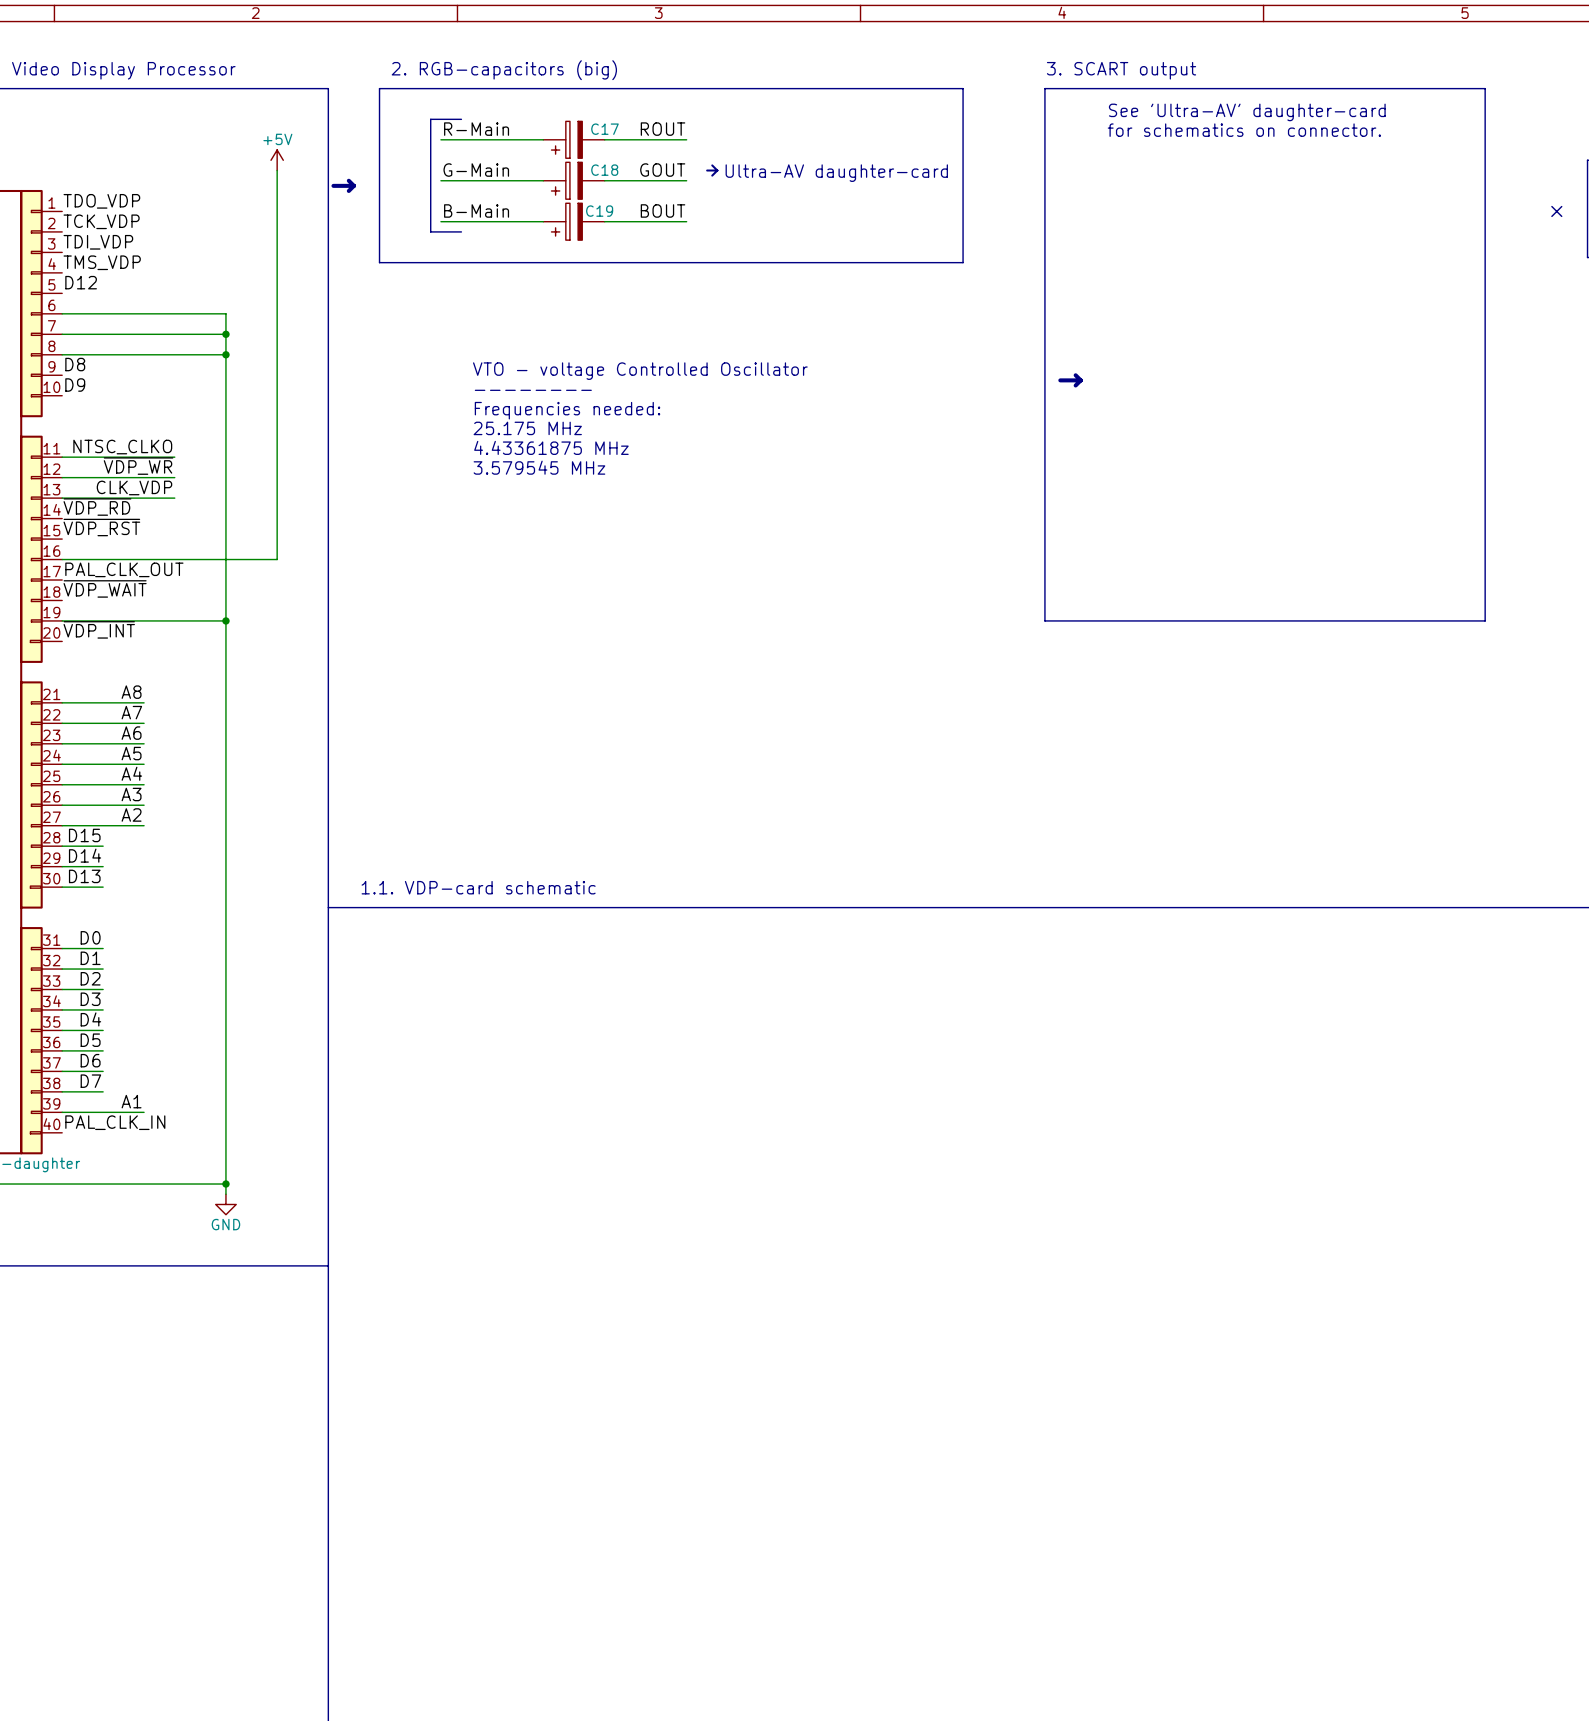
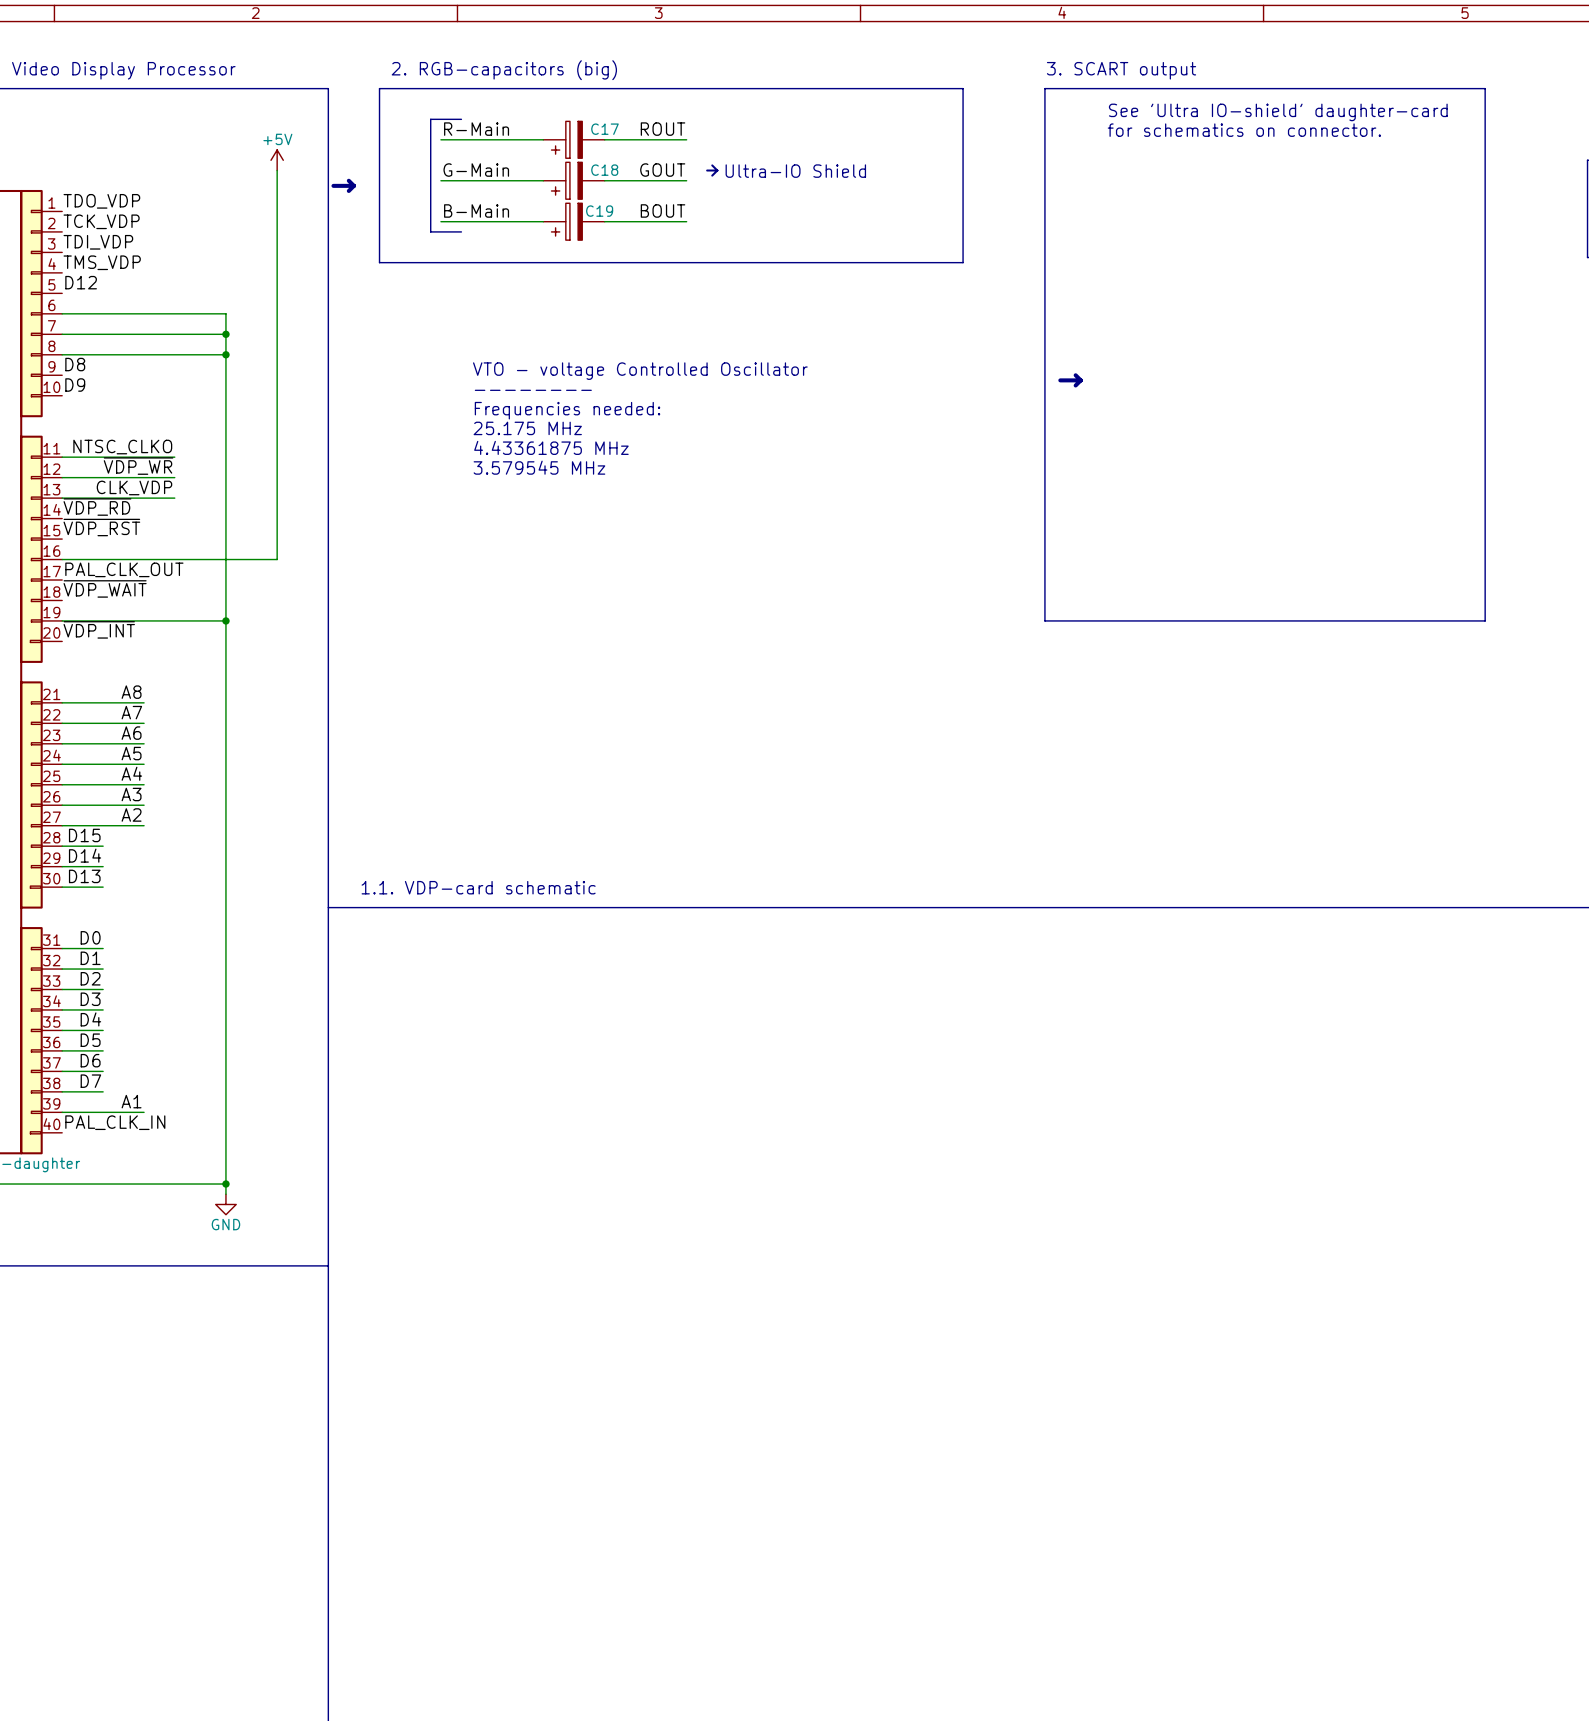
text: See 'Ultra-AV' daughter-card (1247, 112) -> See 'Ultra IO-shield' daughter-card (1278, 112)
text: Ultra-AV daughter-card (836, 173) -> Ultra-IO Shield (795, 171)
no-connect mark: (1556, 211) -> none

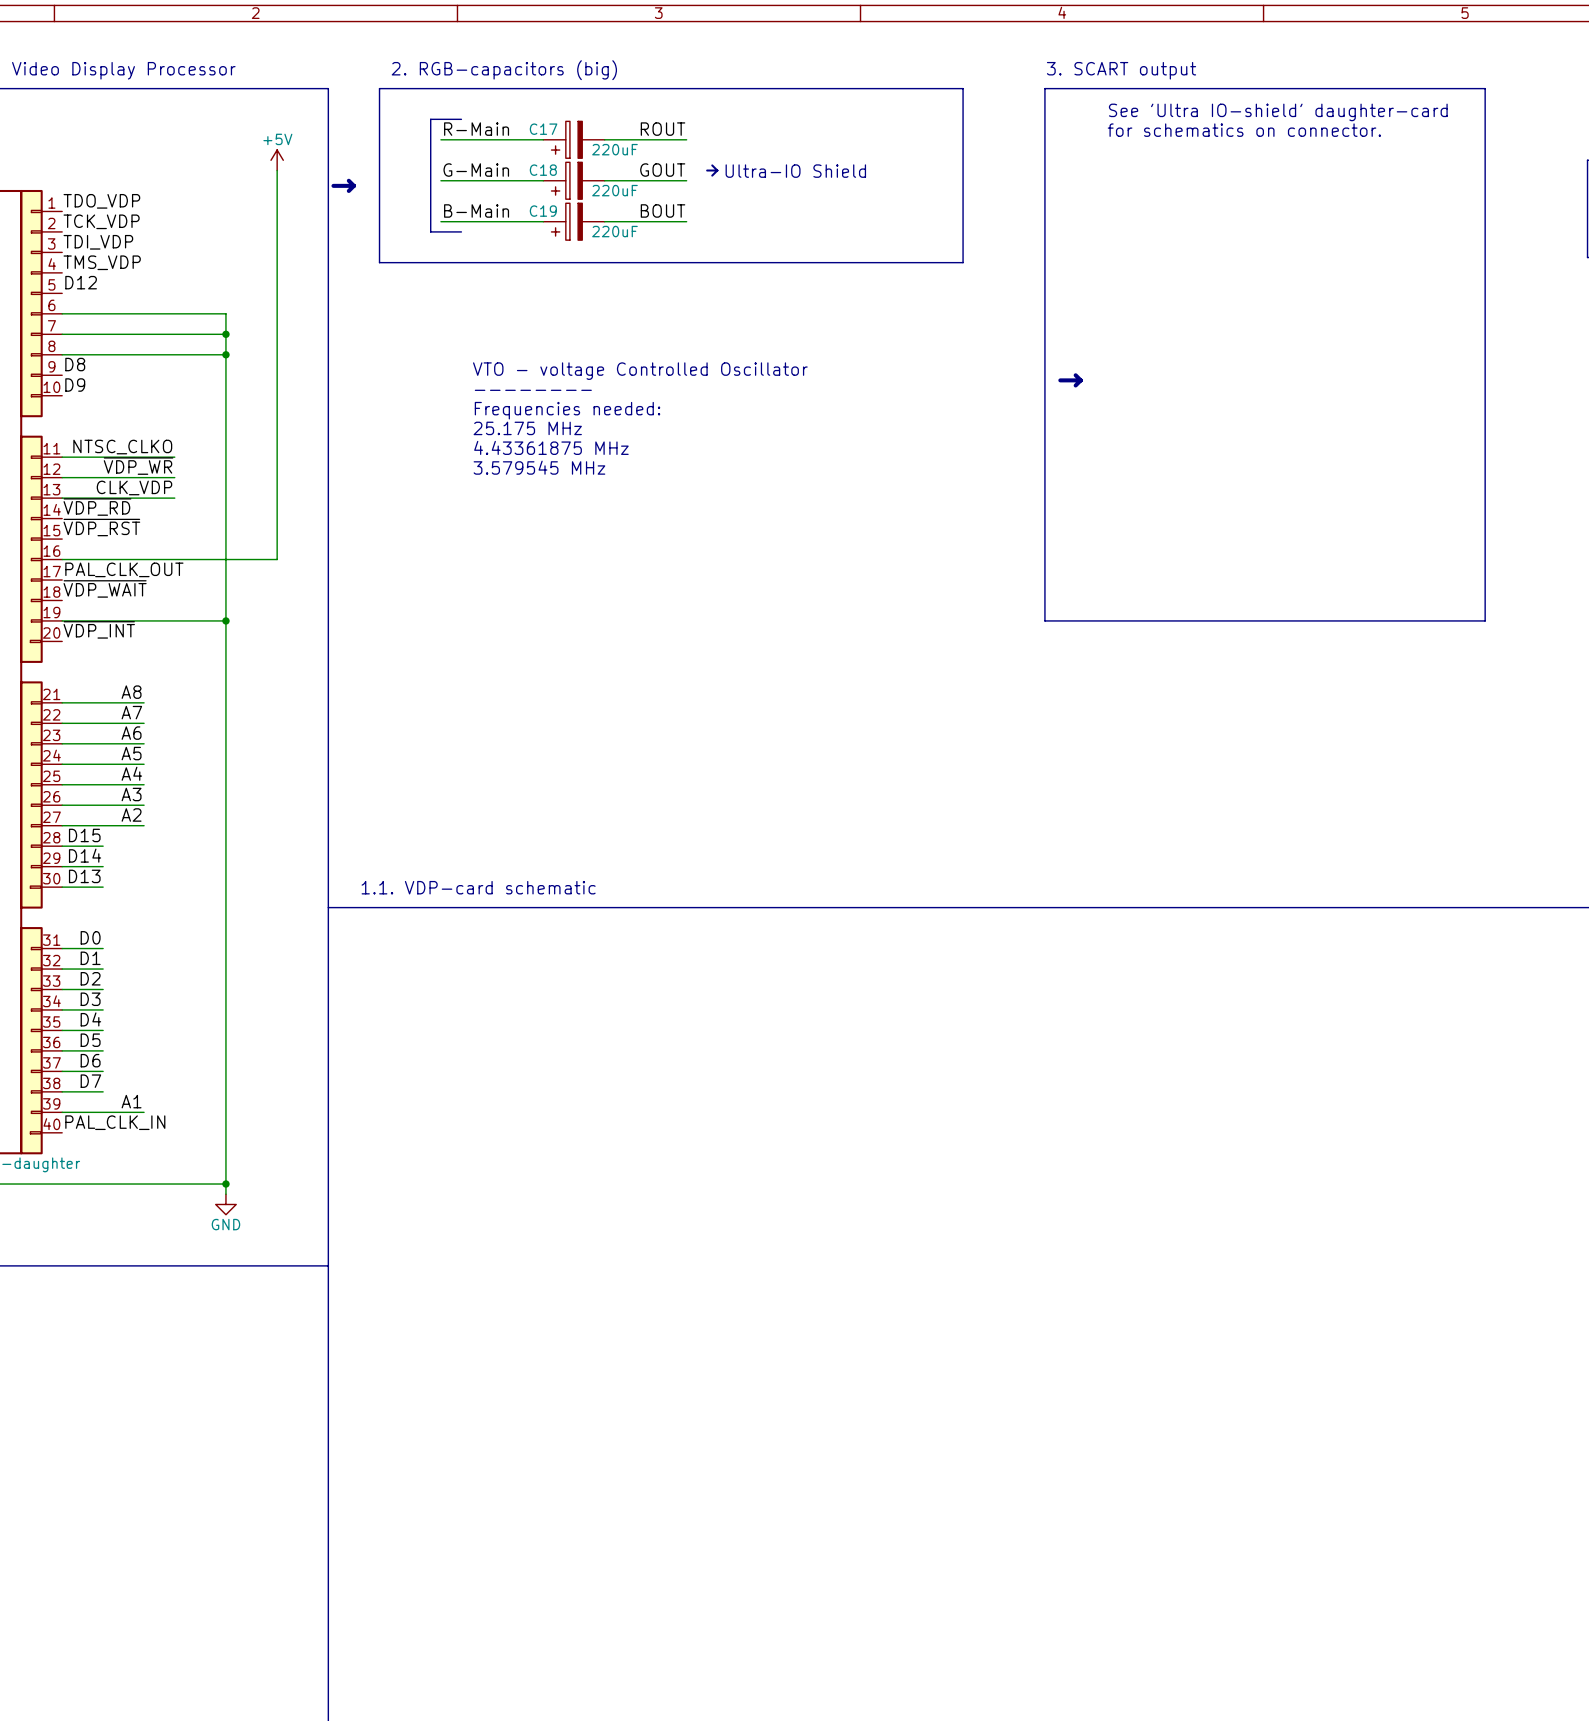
C17 name position: C17 (604, 129) -> C17 (543, 129)
C17 text: none -> 220uF (614, 149)
C18 name position: C18 (604, 170) -> C18 (543, 170)
C18 text: none -> 220uF (614, 190)
C19 name position: C19 (599, 211) -> C19 (543, 211)
C19 text: none -> 220uF (614, 231)

